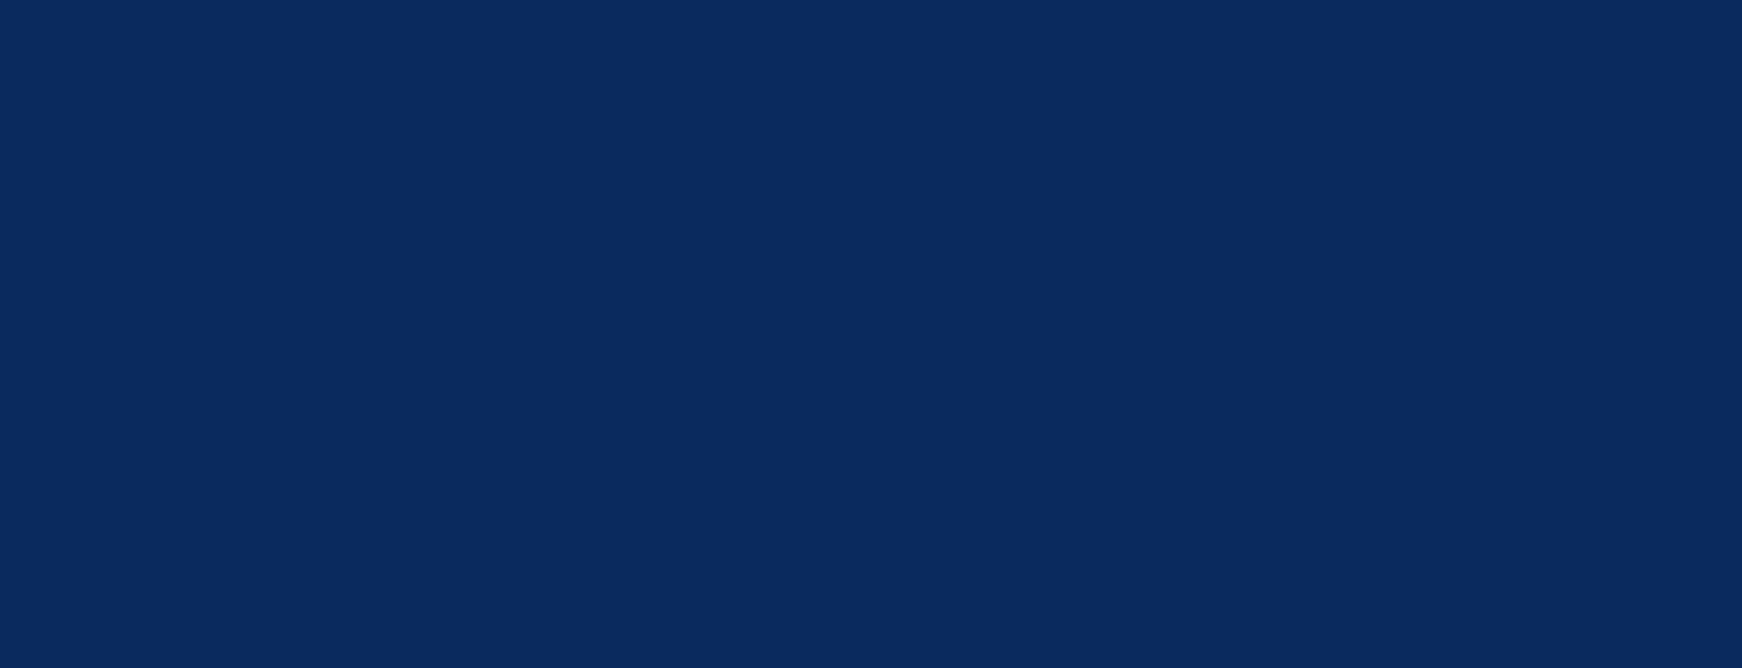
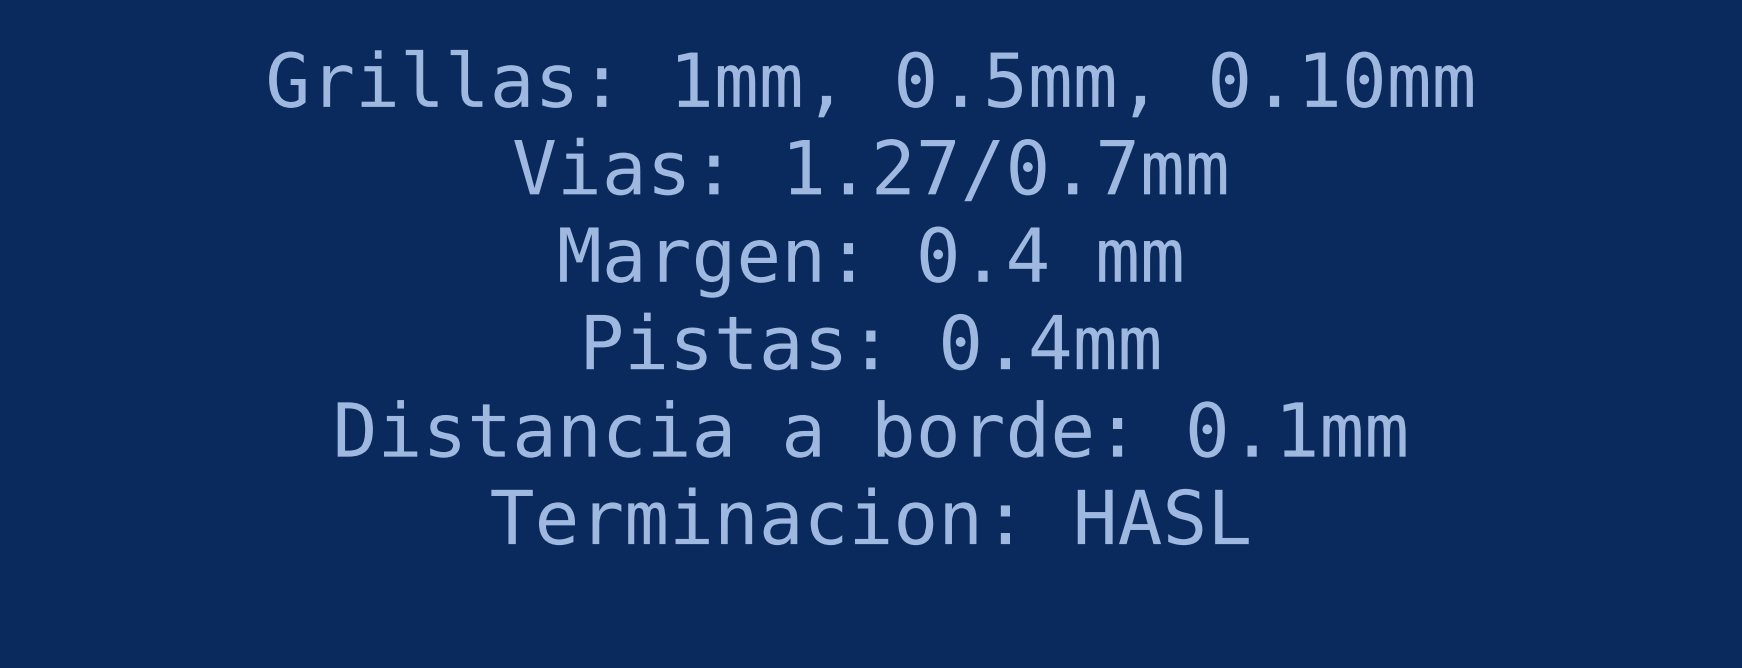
text: none -> Grillas: 1mm, 0.5mm, 0.10mm (870, 83)
text: none -> Vias: 1.27/0.7mm (870, 169)
text: none -> Margen: 0.4 mm (870, 262)
text: none -> Pistas: 0.4mm (872, 341)
text: none -> Distancia a borde: 0.1mm (871, 428)
text: none -> Terminacion: HASL (870, 516)

